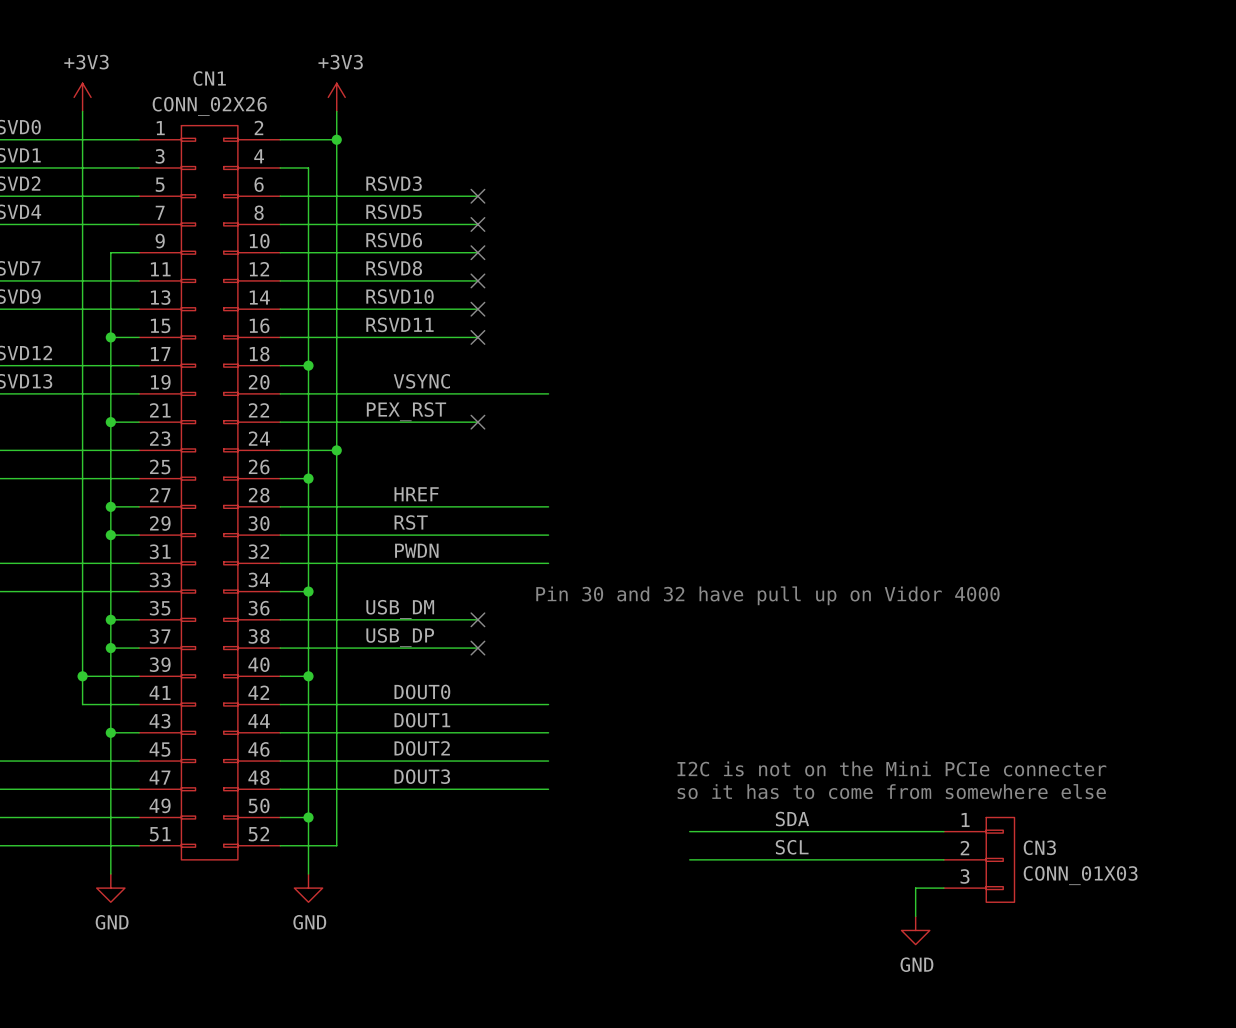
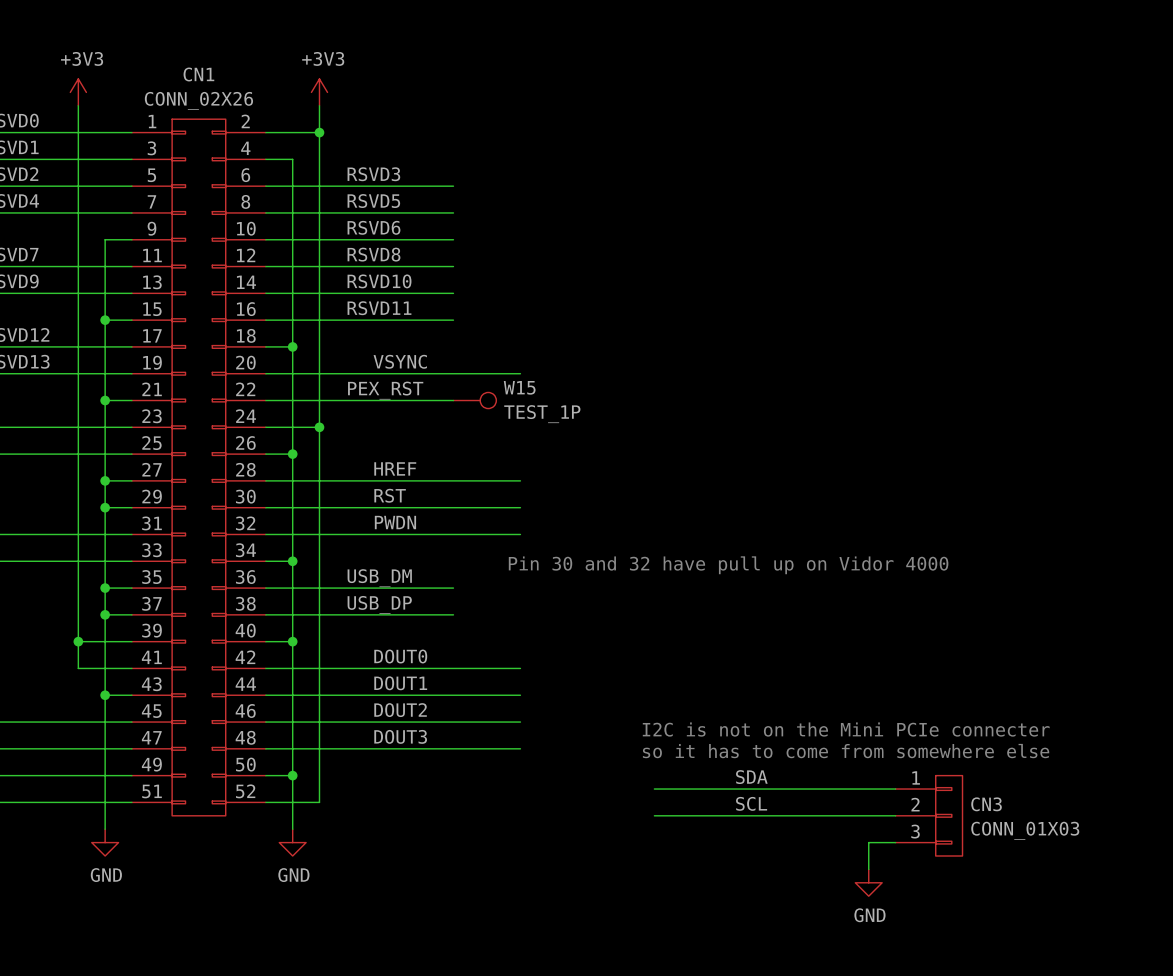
no-connect mark: (477, 196) -> none
no-connect mark: (477, 224) -> none
no-connect mark: (477, 252) -> none
no-connect mark: (477, 280) -> none
no-connect mark: (477, 309) -> none
no-connect mark: (477, 337) -> none
no-connect mark: (477, 422) -> none
W15: none -> TEST_1P (474, 400)
no-connect mark: (477, 619) -> none
no-connect mark: (477, 648) -> none

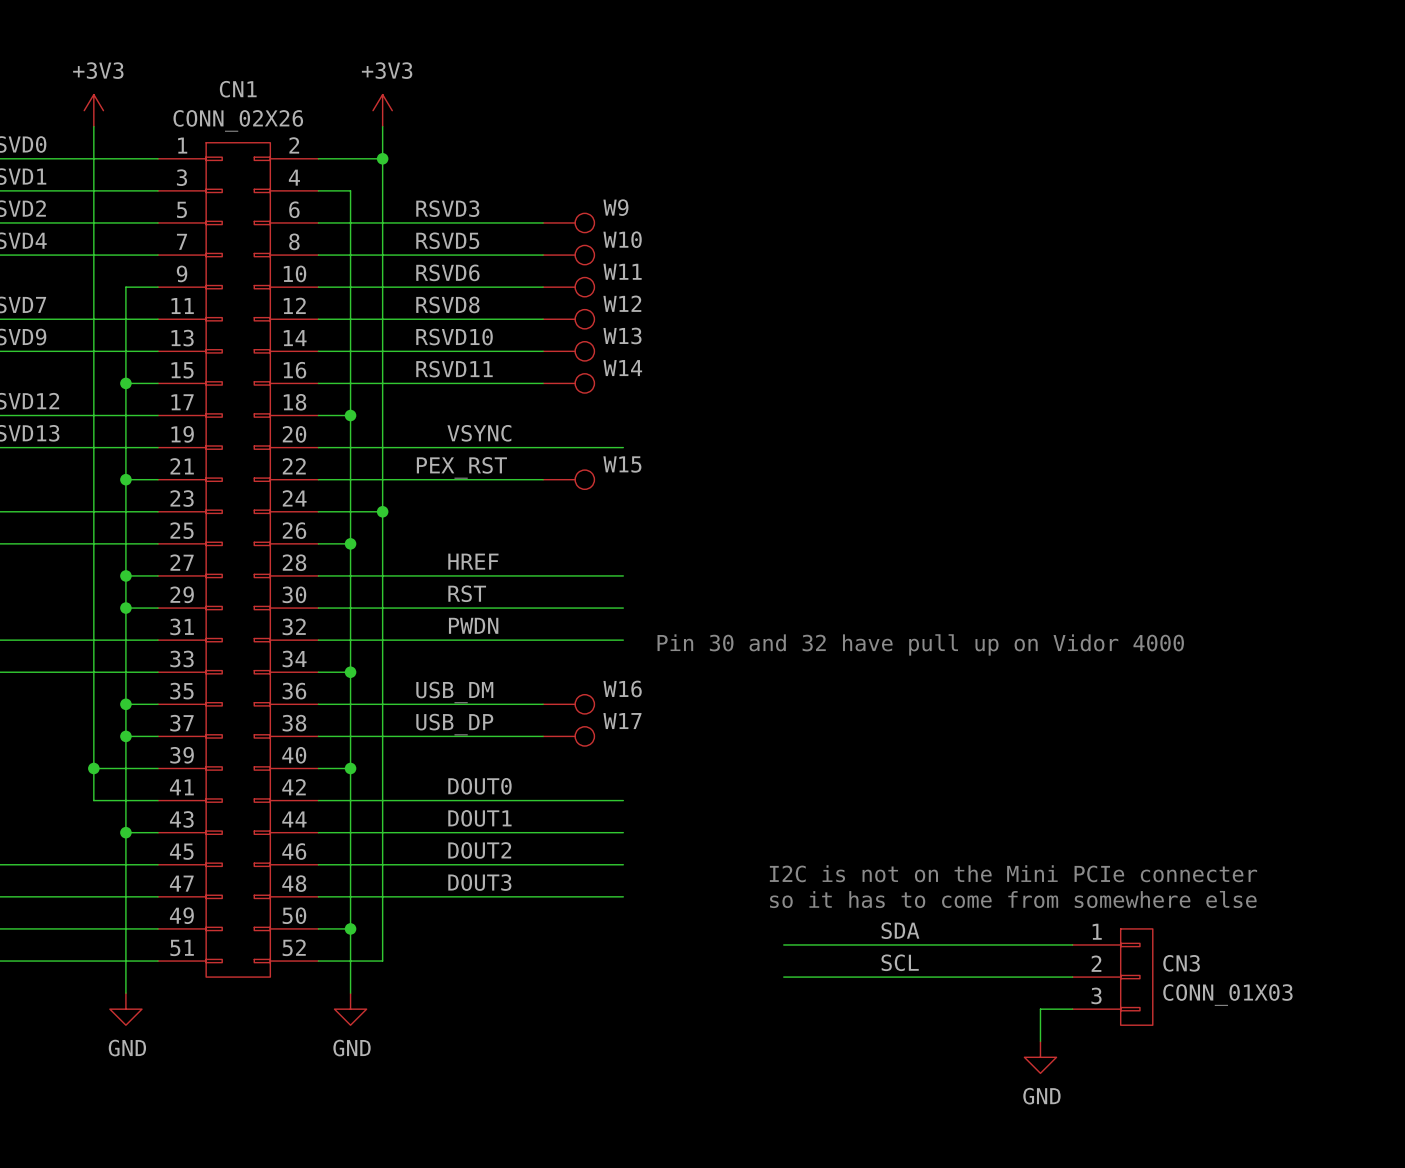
W9: none -> (568, 222)
W10: none -> (568, 255)
W11: none -> (568, 287)
W12: none -> (568, 319)
W13: none -> (568, 351)
W14: none -> (568, 383)
W15 value: TEST_1P (542, 414) -> none
text position: Pin 30 and 32 have pull up on Vidor 4000 (728, 565) -> Pin 30 and 32 have pull up on Vidor 4000 (920, 644)
W16: none -> (568, 704)
W17: none -> (568, 736)

